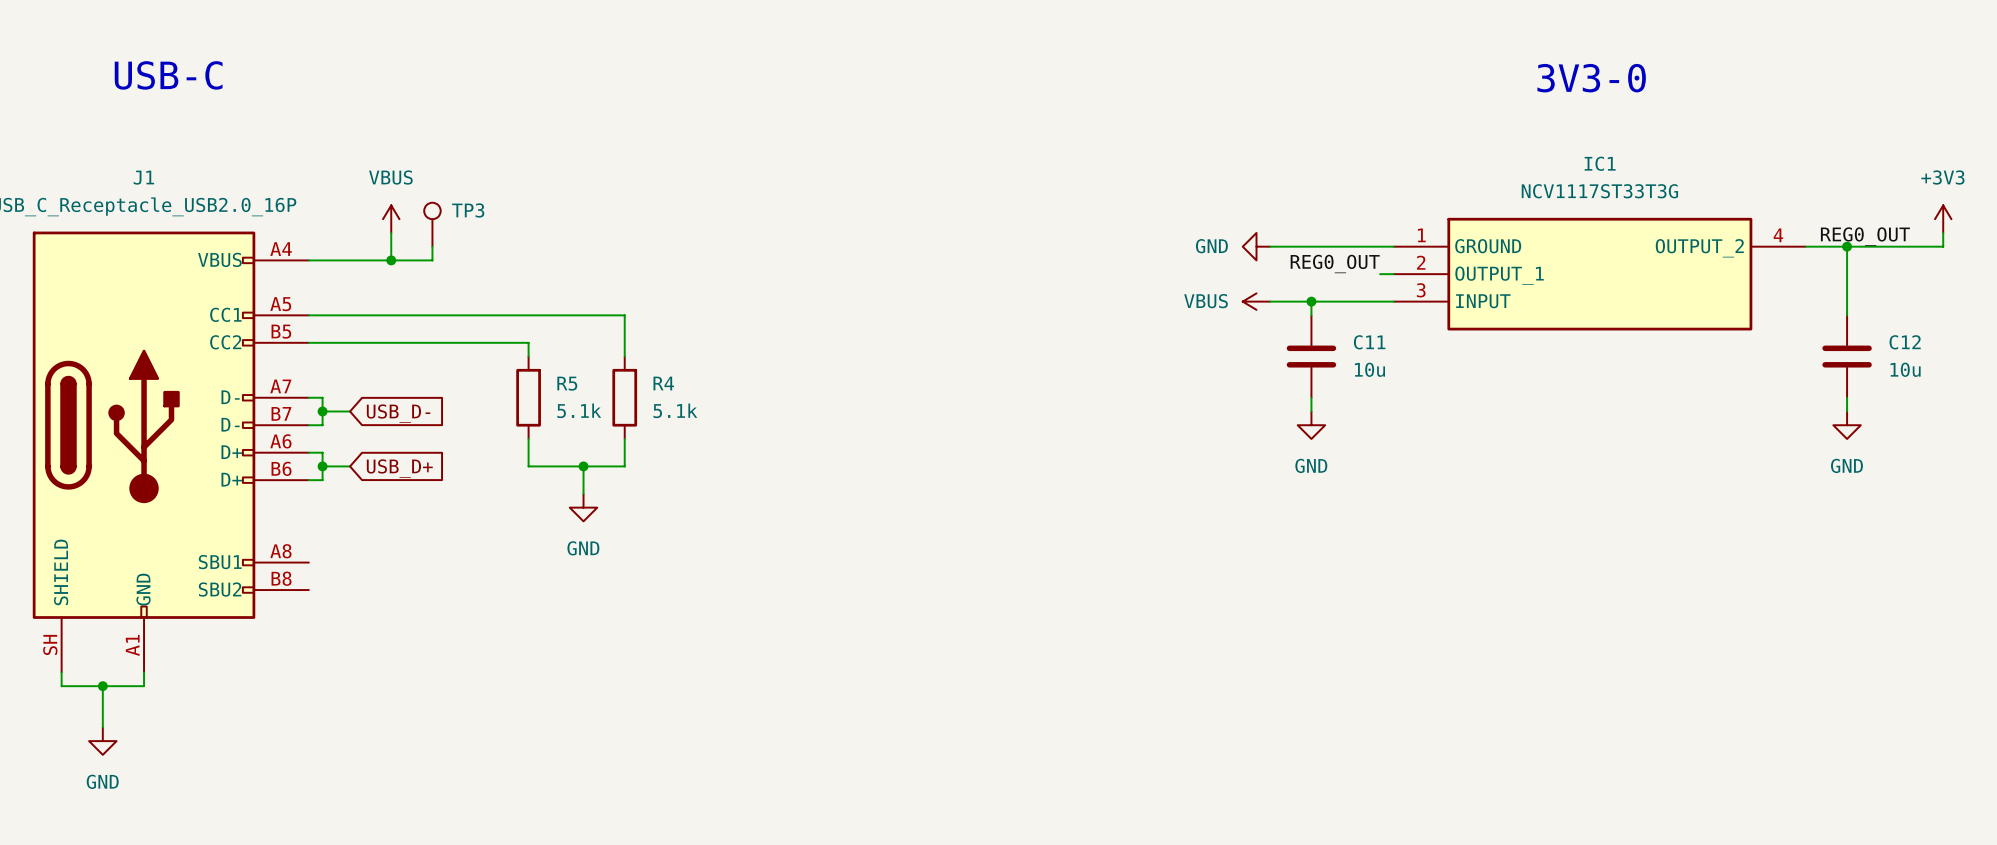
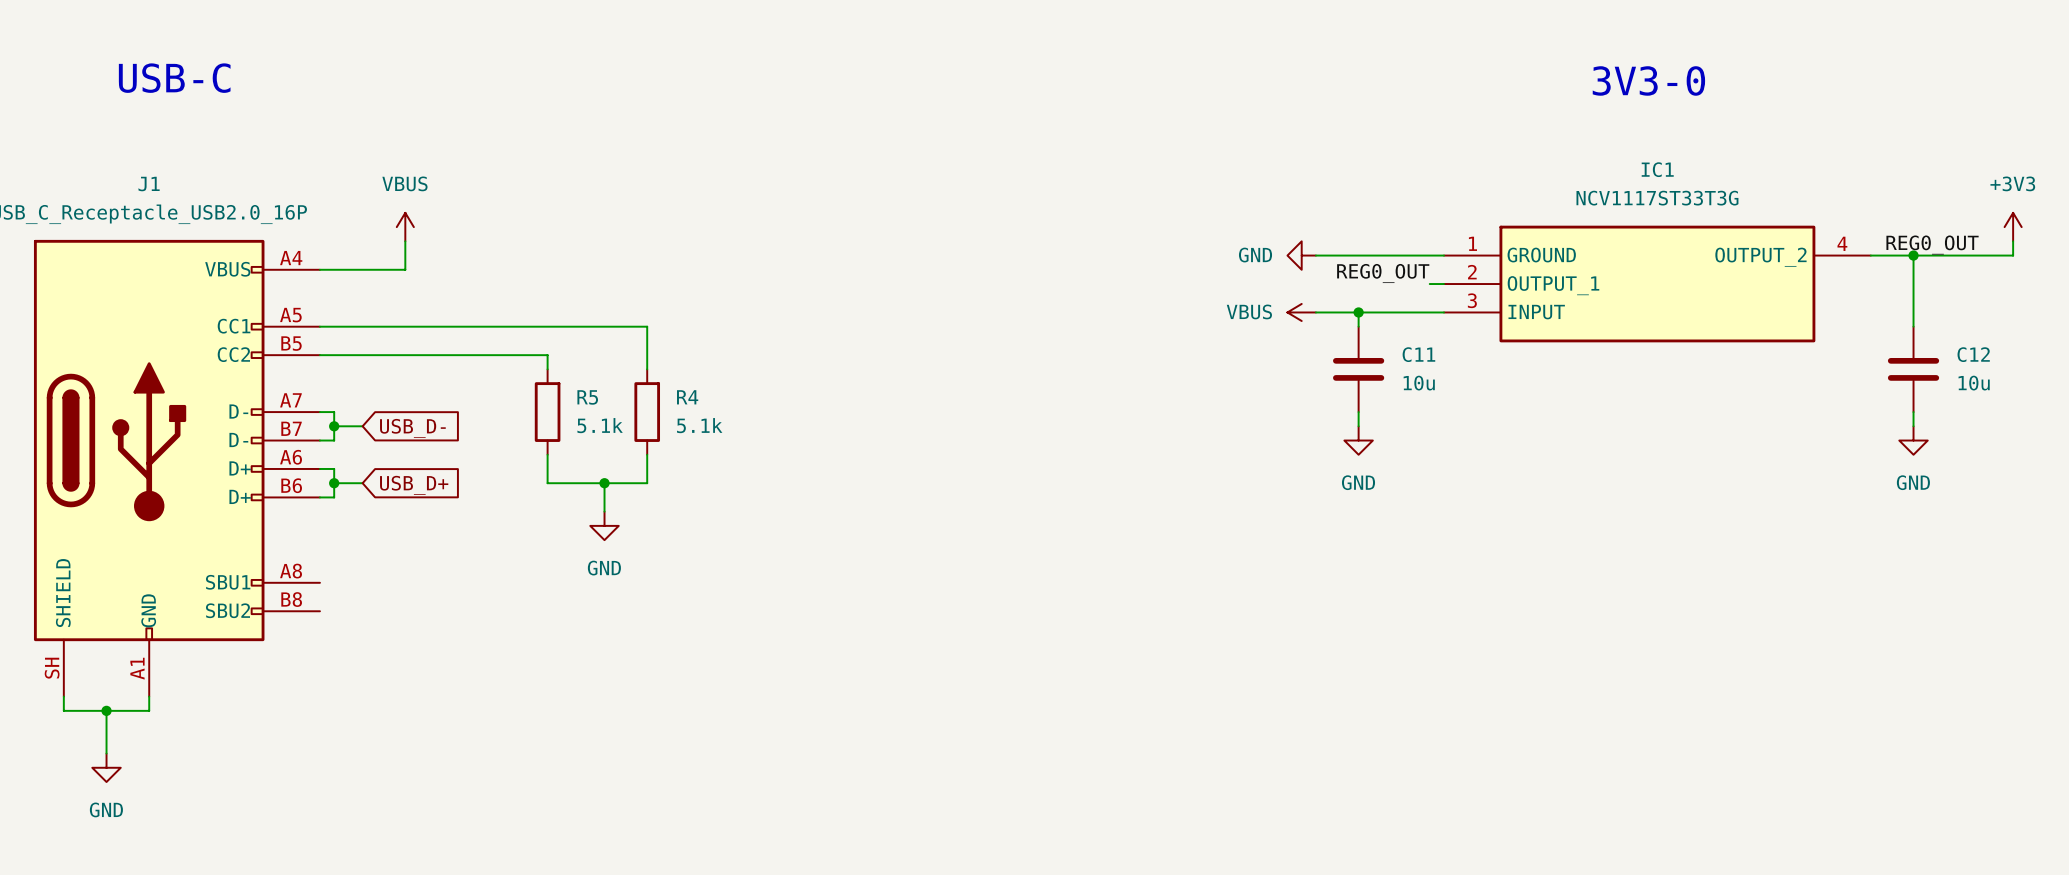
TP3: (432, 224) -> none
wire: (432, 246) (432, 260) (391, 260) -> none
junction: (391, 260) -> none

